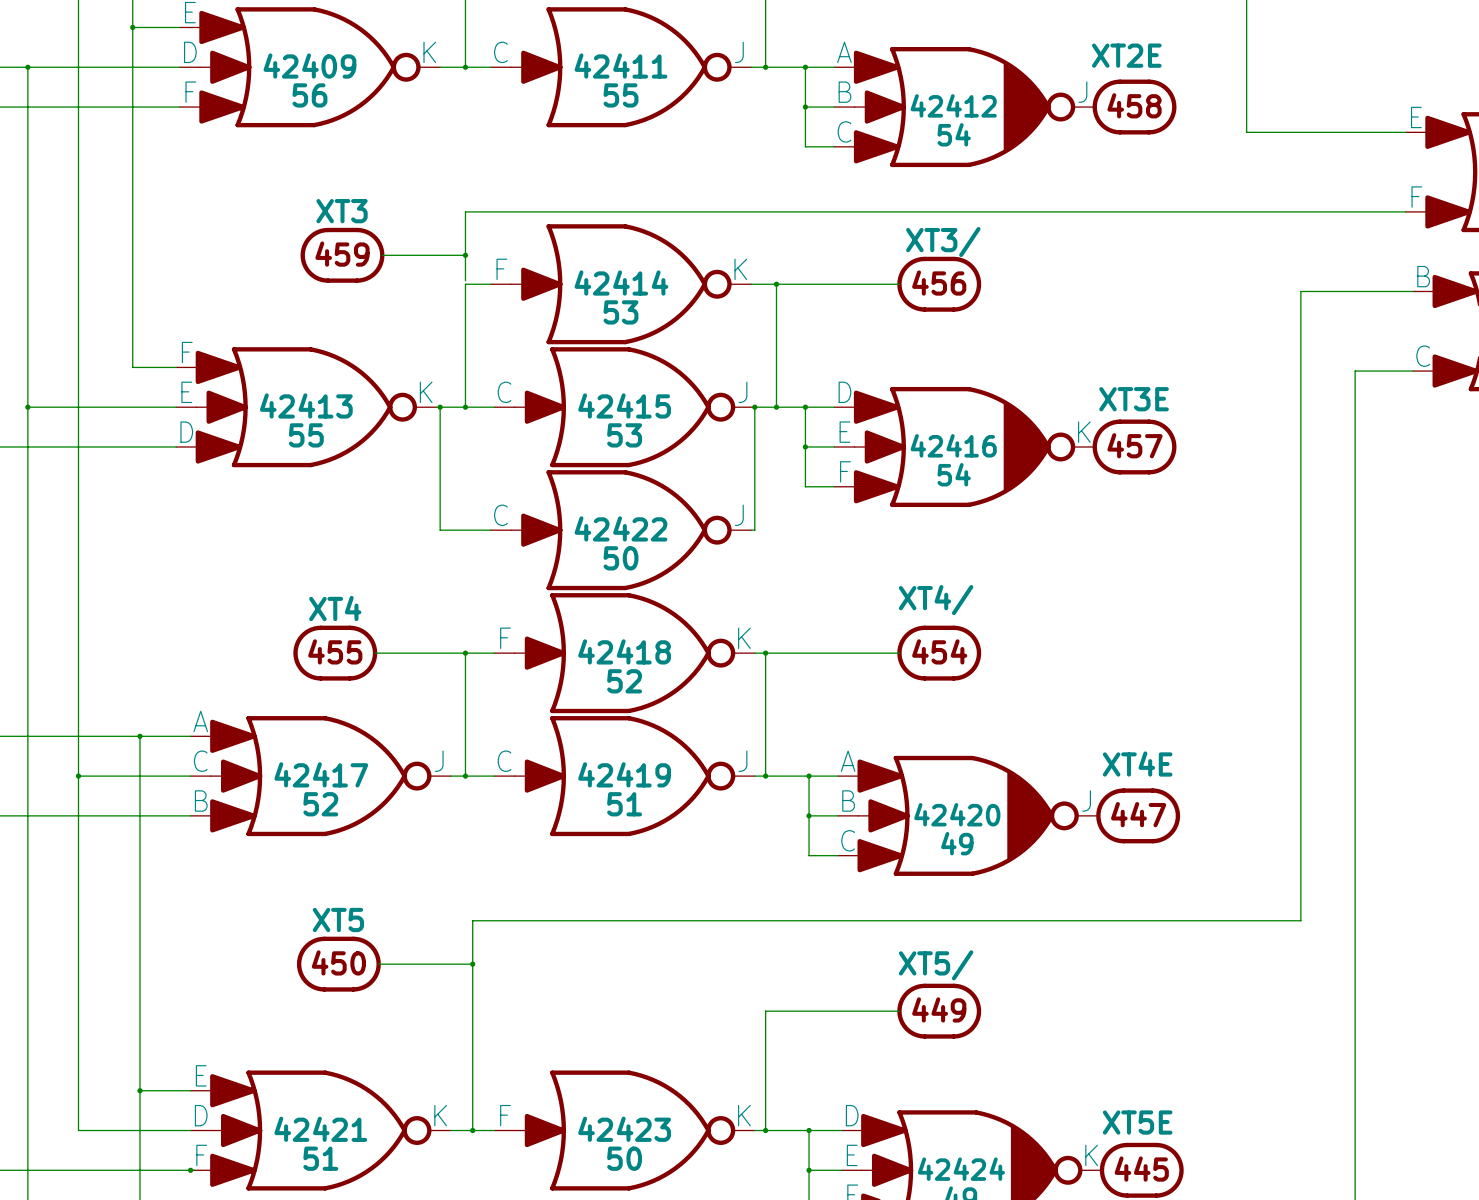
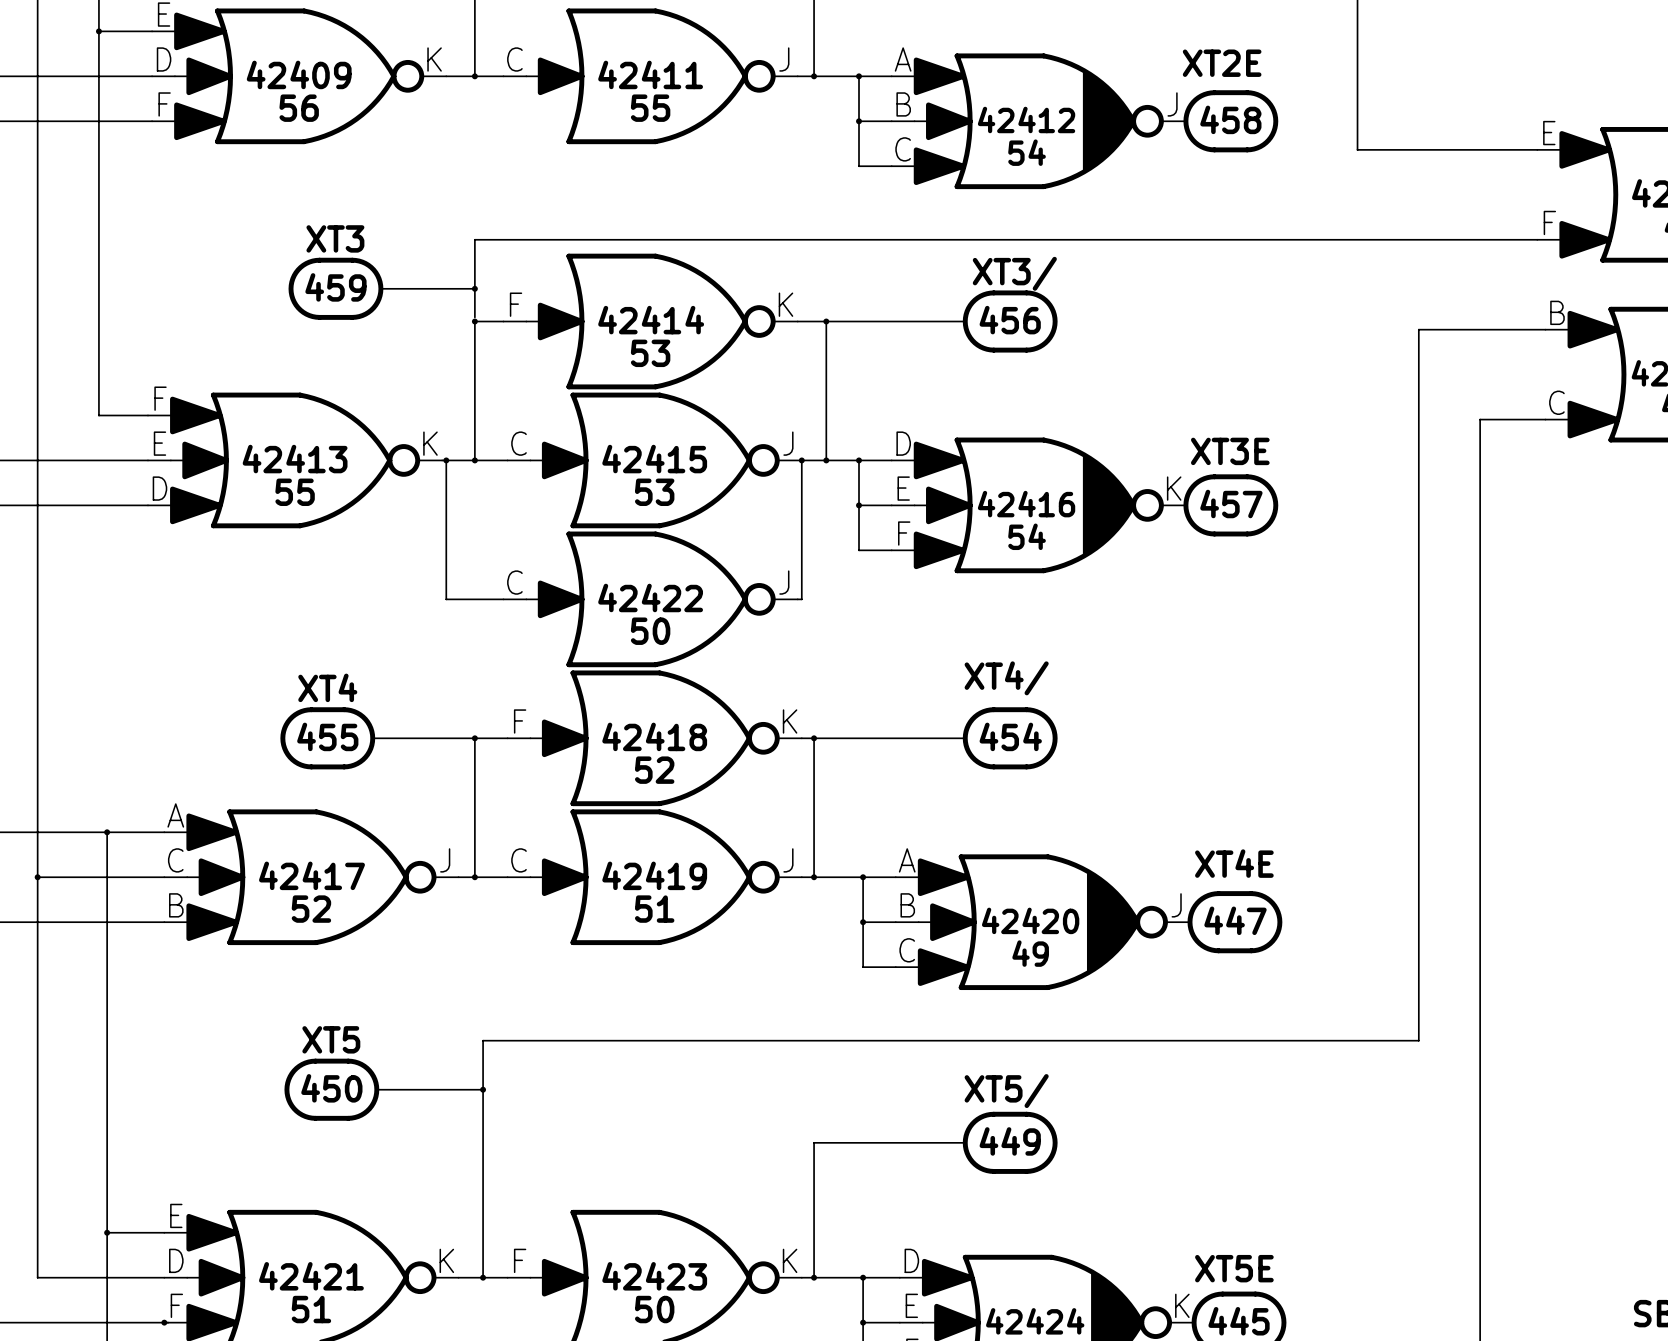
junction: none -> (474, 321)

